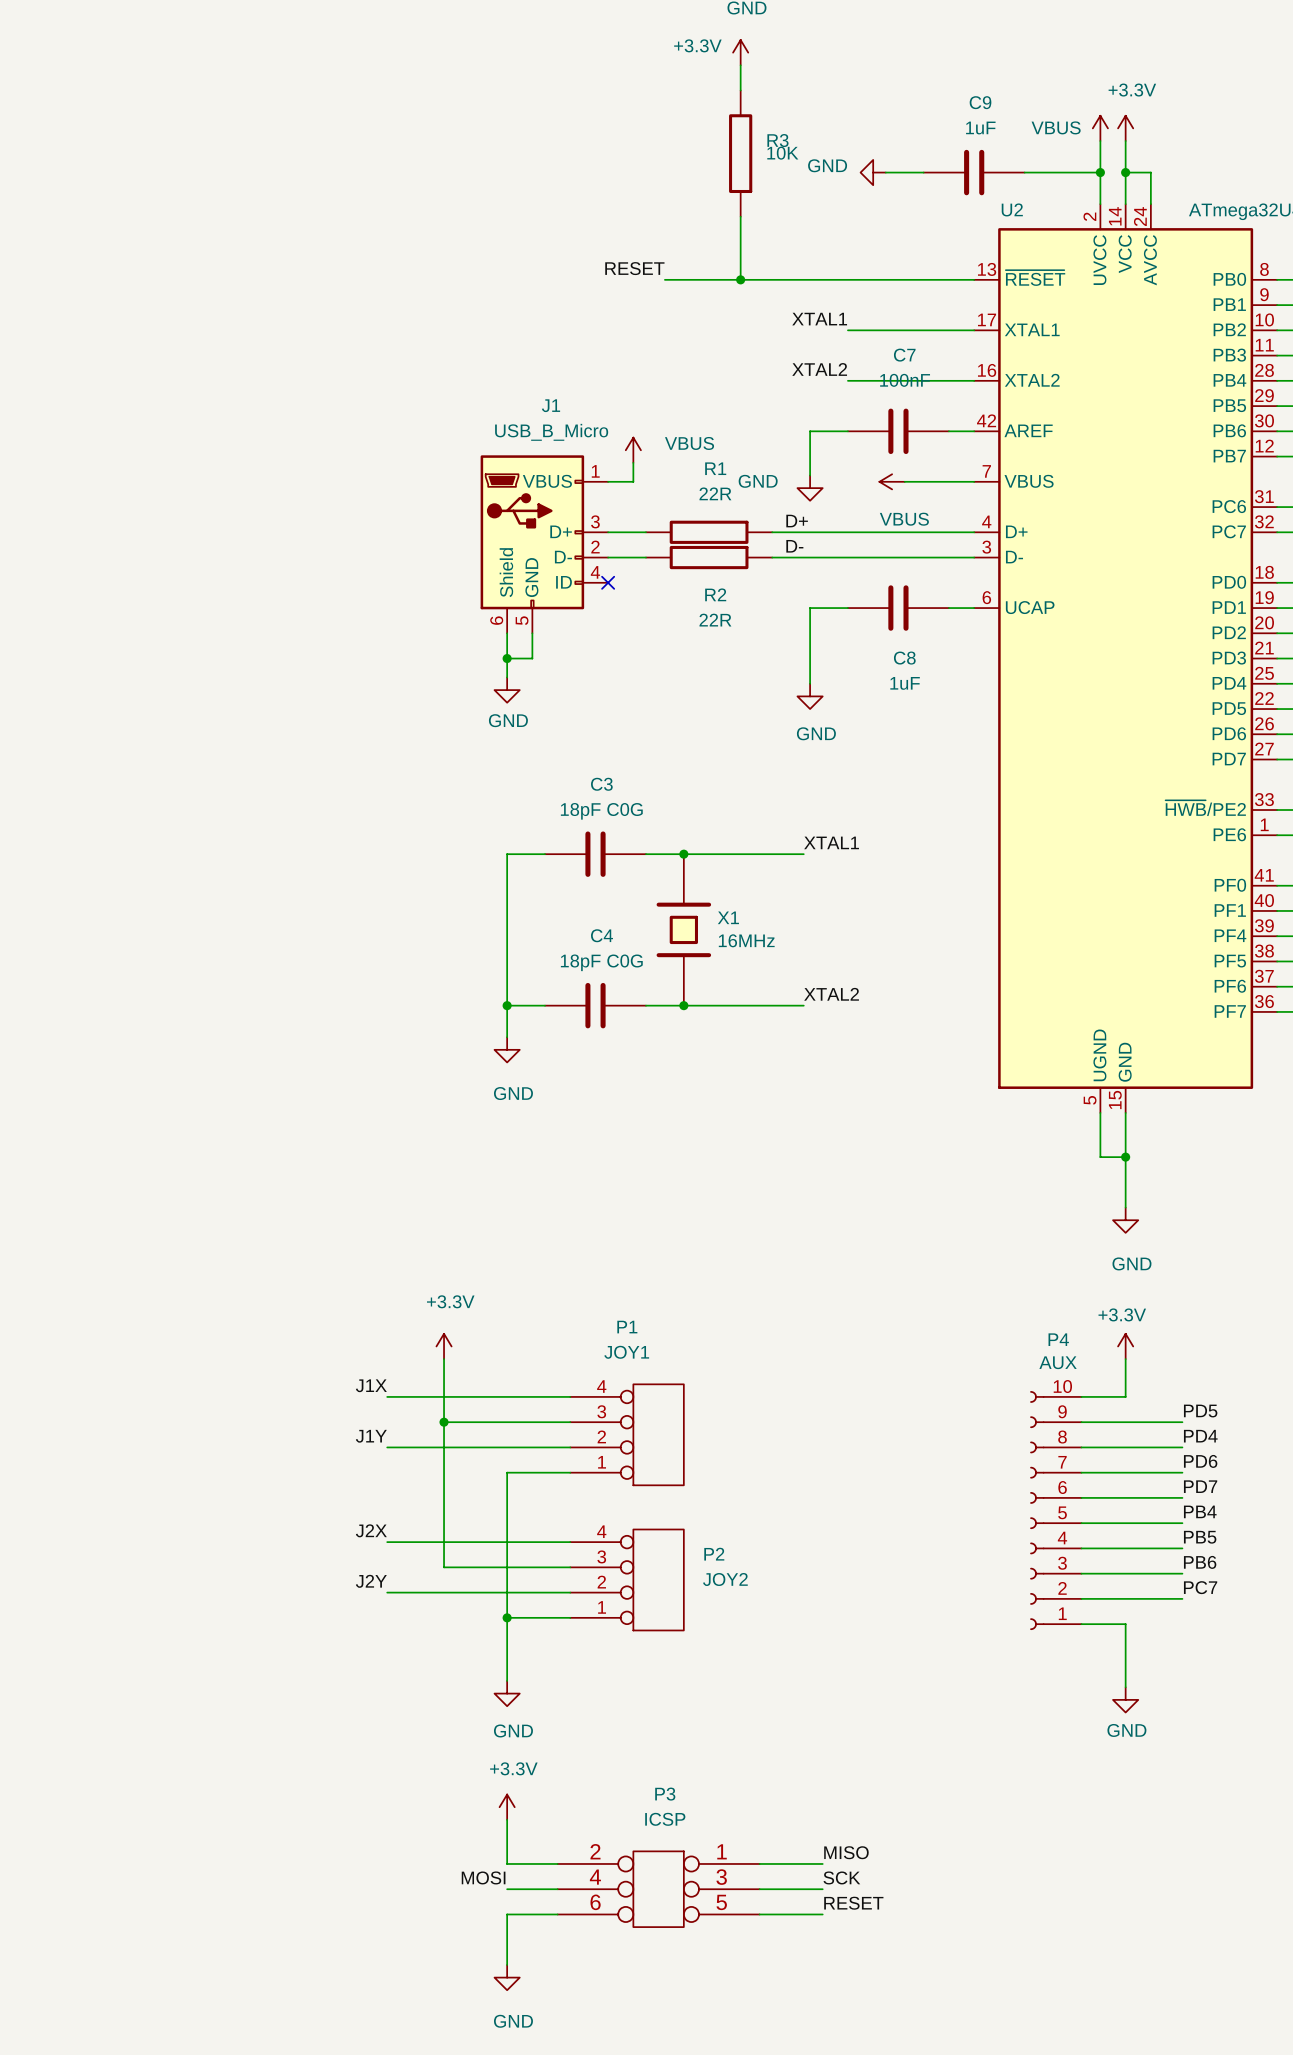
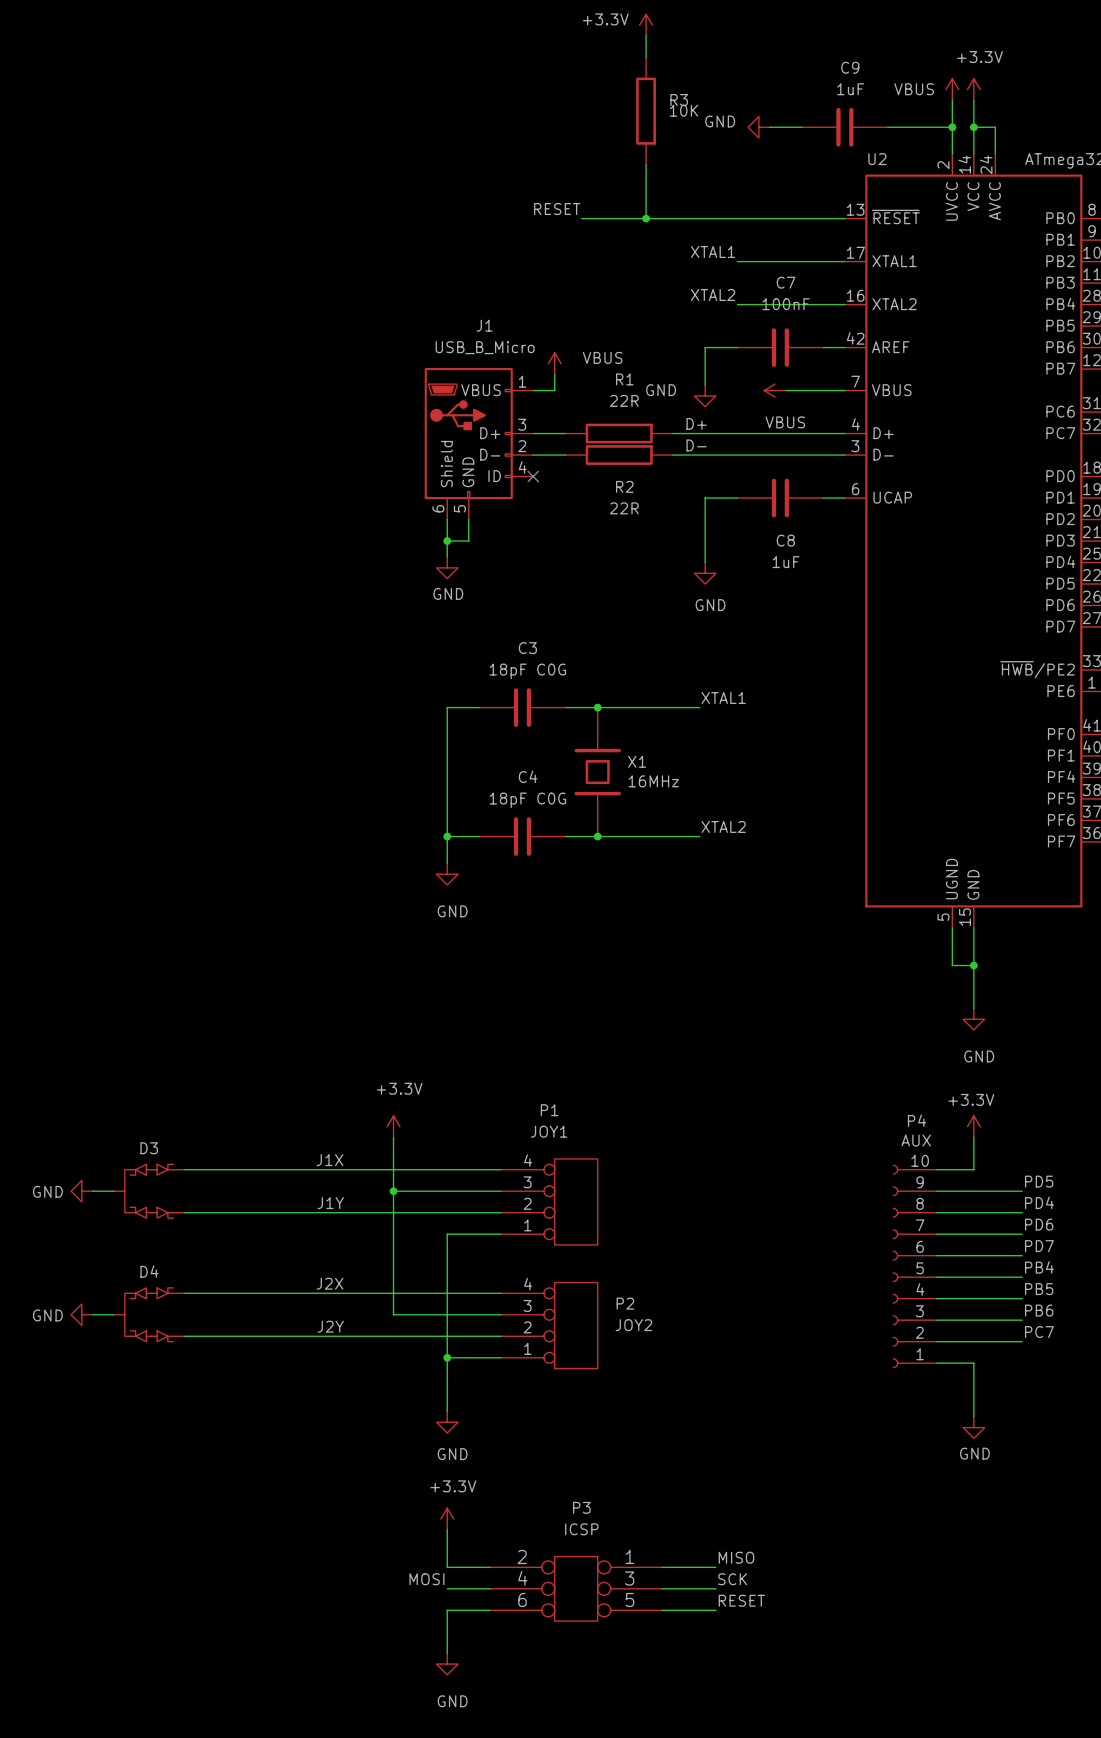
wire: none -> (183, 1169) (345, 1169)
power symbol: none -> GND (81, 1191)
wire: none -> (92, 1191) (114, 1191)
D3: none -> (149, 1191)
wire: none -> (183, 1212) (345, 1212)
wire: none -> (183, 1293) (345, 1293)
power symbol: none -> GND (81, 1314)
wire: none -> (92, 1314) (114, 1314)
D4: none -> (149, 1314)
wire: none -> (183, 1336) (345, 1336)

